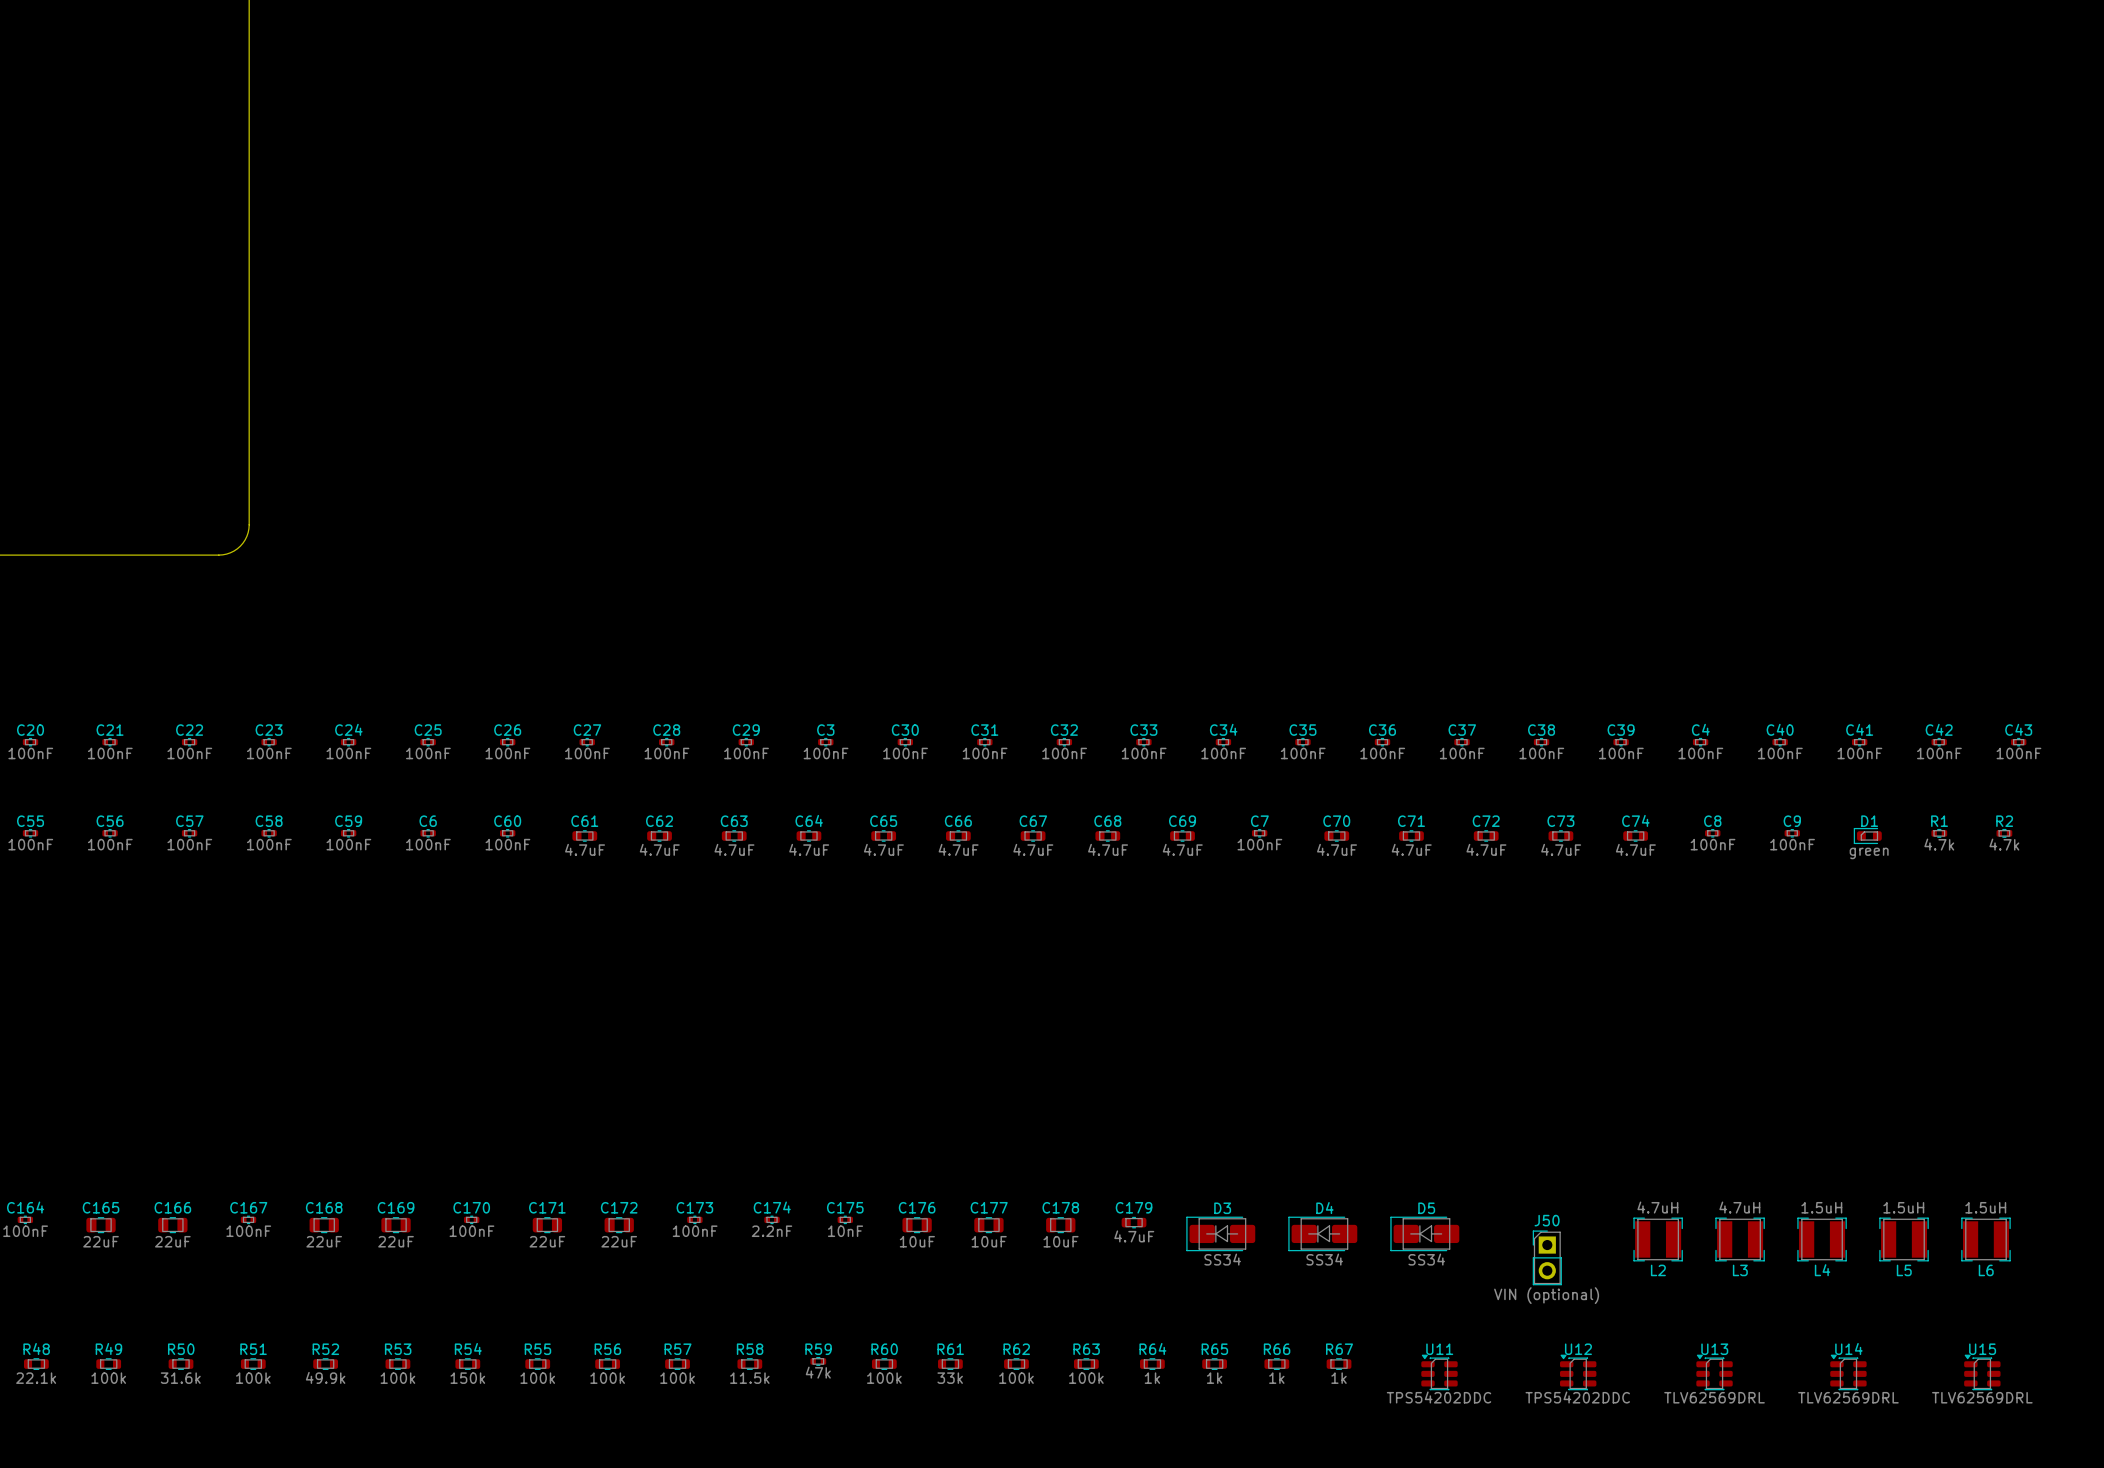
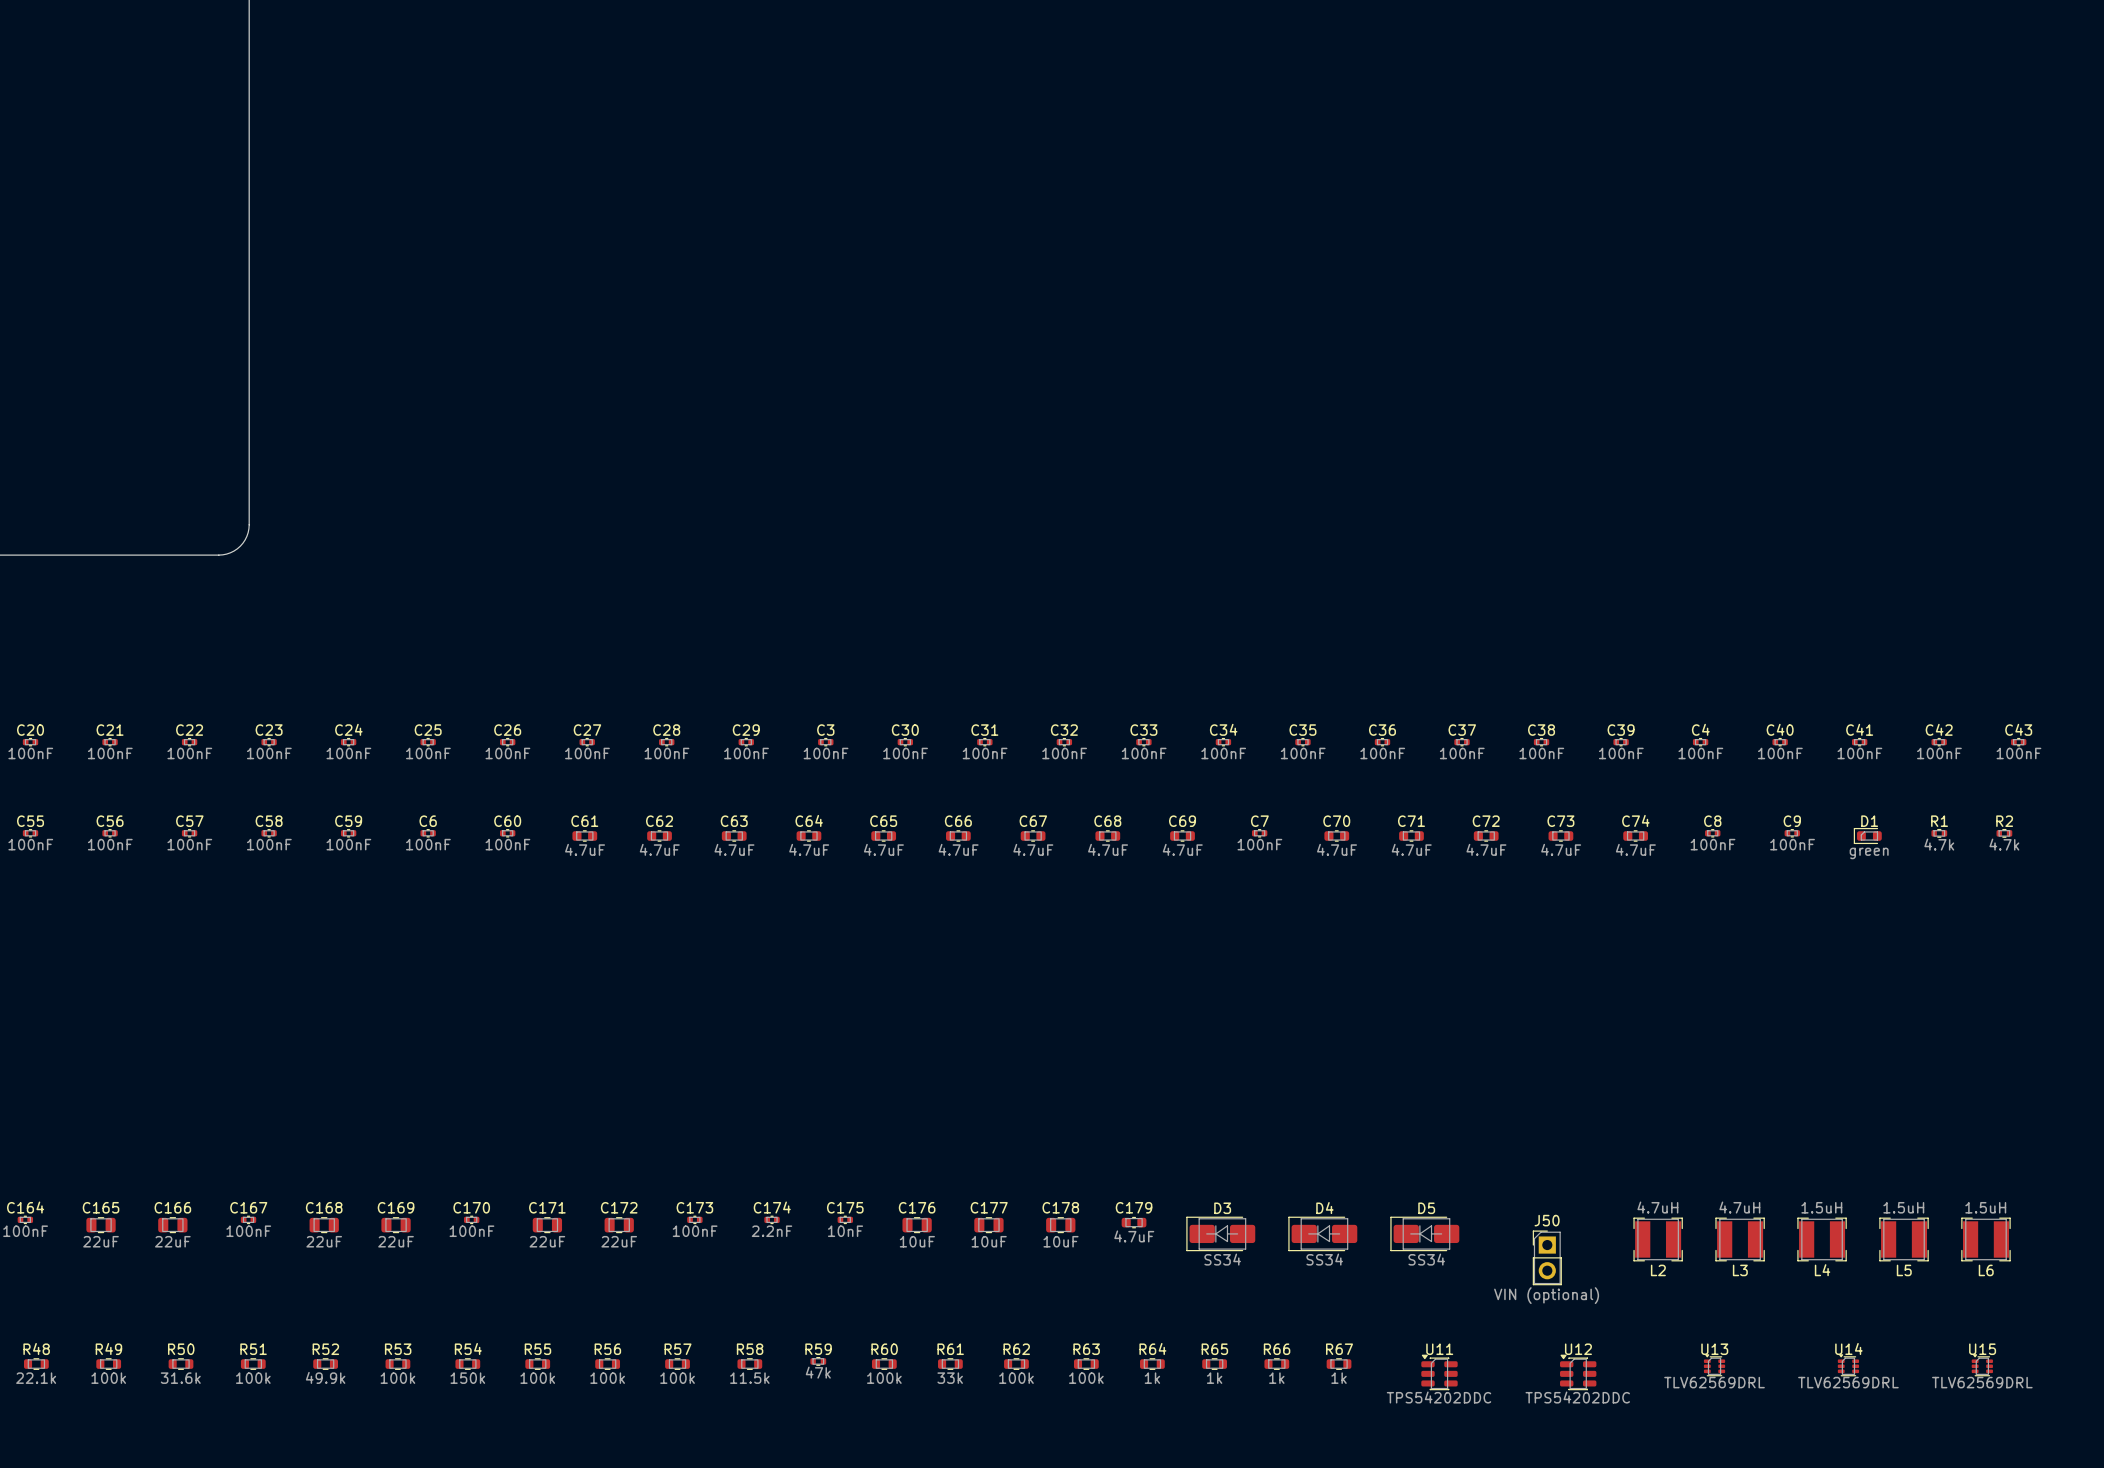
U13 footprint: [1696, 1354, 1733, 1391] -> [1703, 1354, 1726, 1377]
U14 footprint: [1830, 1354, 1867, 1391] -> [1837, 1354, 1860, 1377]
U15 footprint: [1964, 1354, 2001, 1391] -> [1971, 1354, 1993, 1377]

